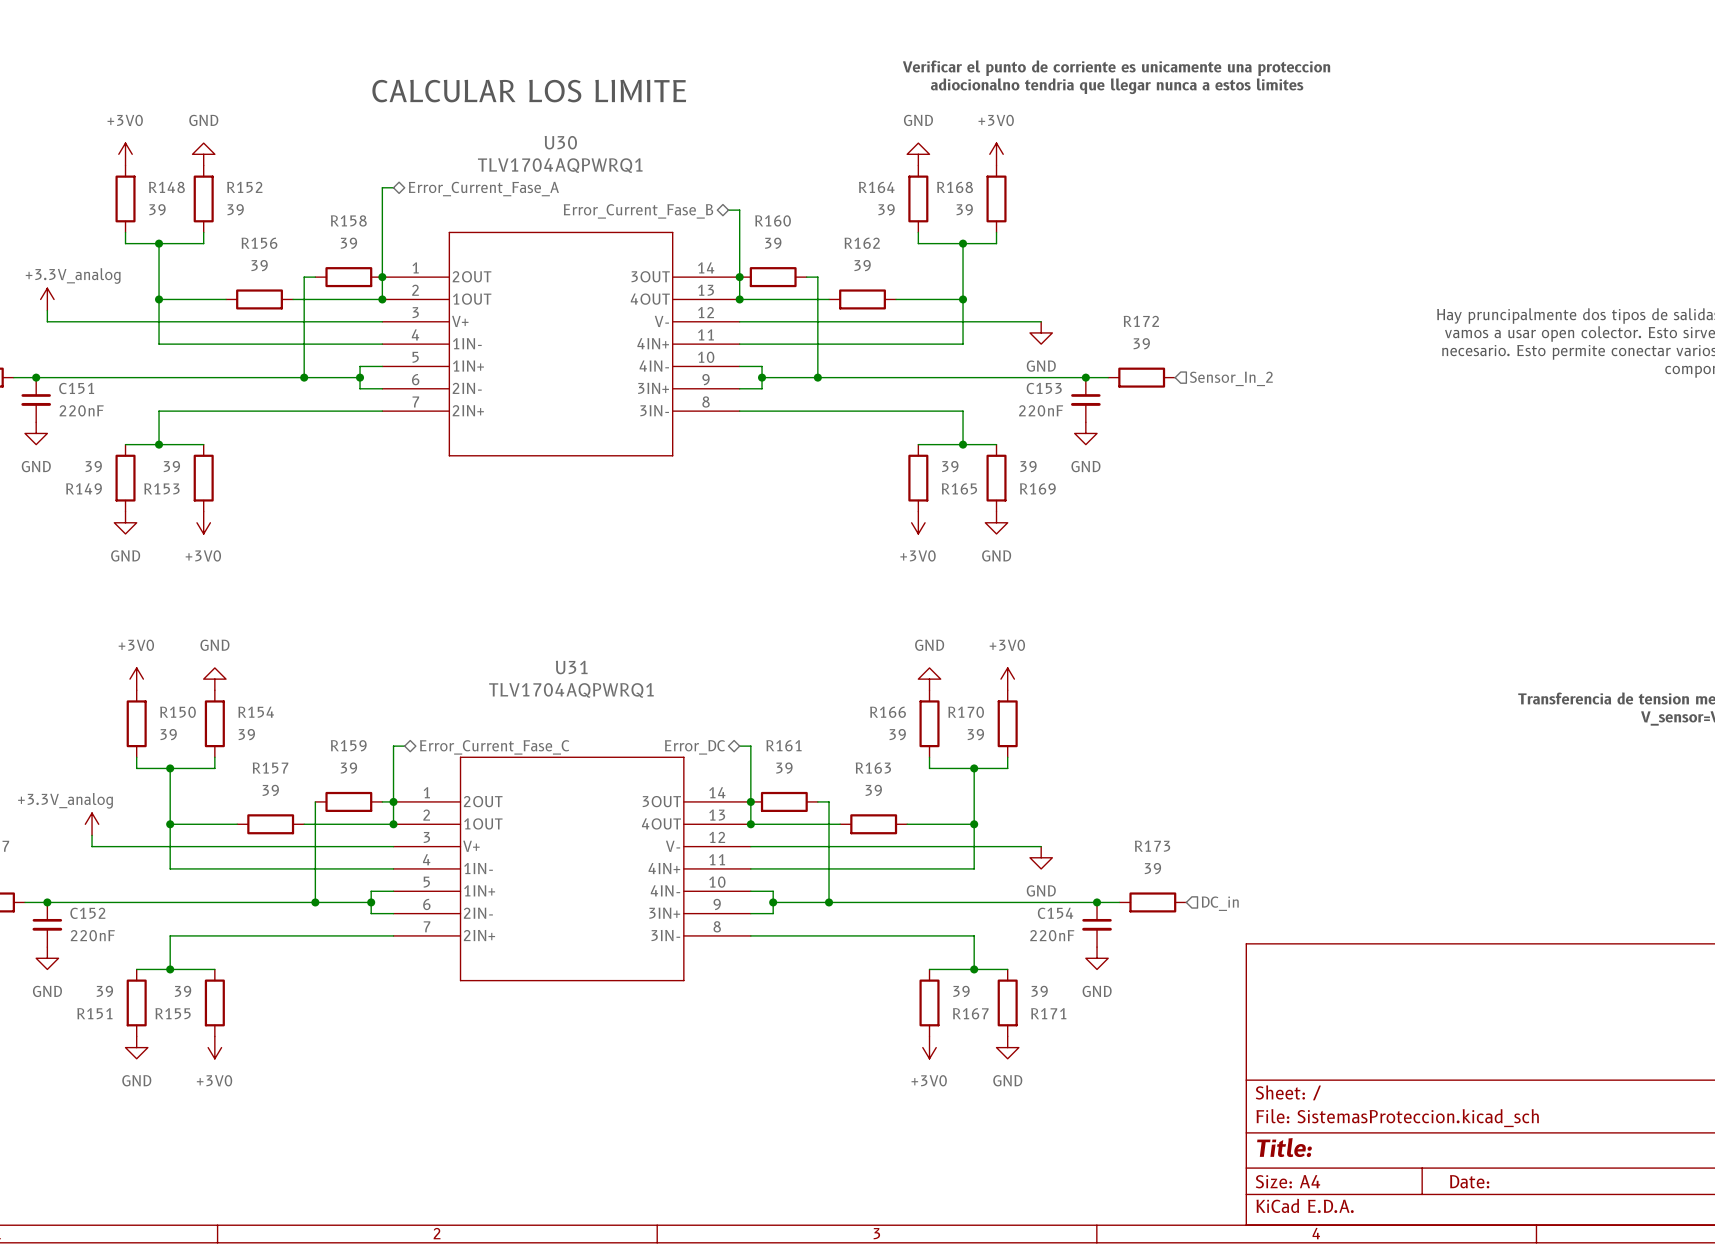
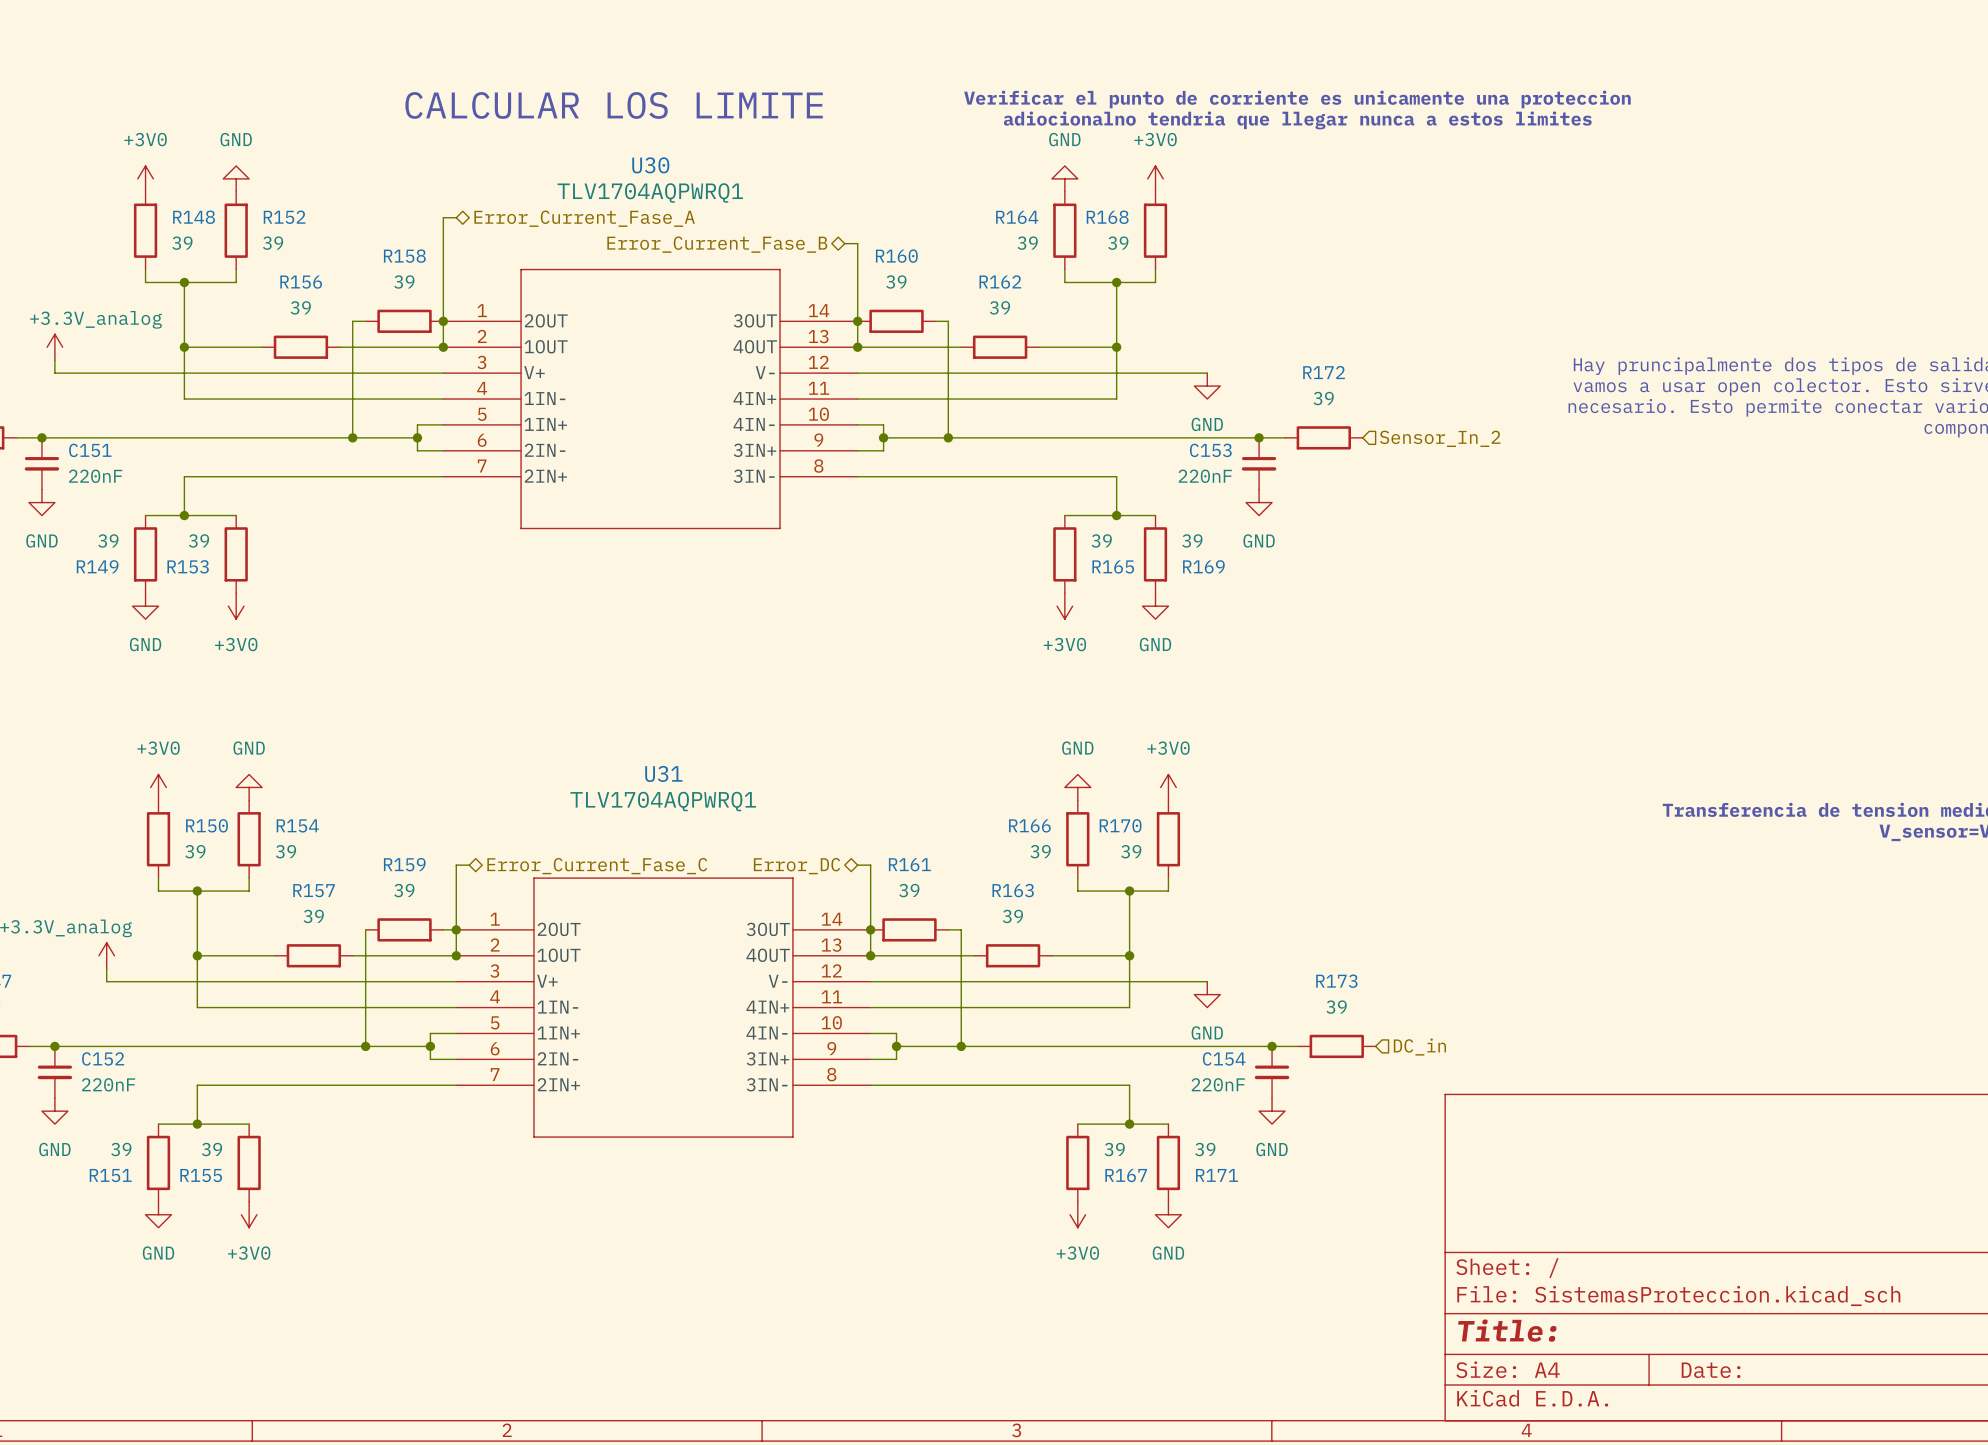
text: Verificar el punto de corriente es unicamente una proteccion (1116, 68) -> none
text: adiocionalno tendria que llegar nunca a estos limites (1117, 86) -> Verificar el punto de corriente es unicamente una proteccion (1297, 99)
text: none -> adiocionalno tendria que llegar nunca a estos limites (1297, 120)

